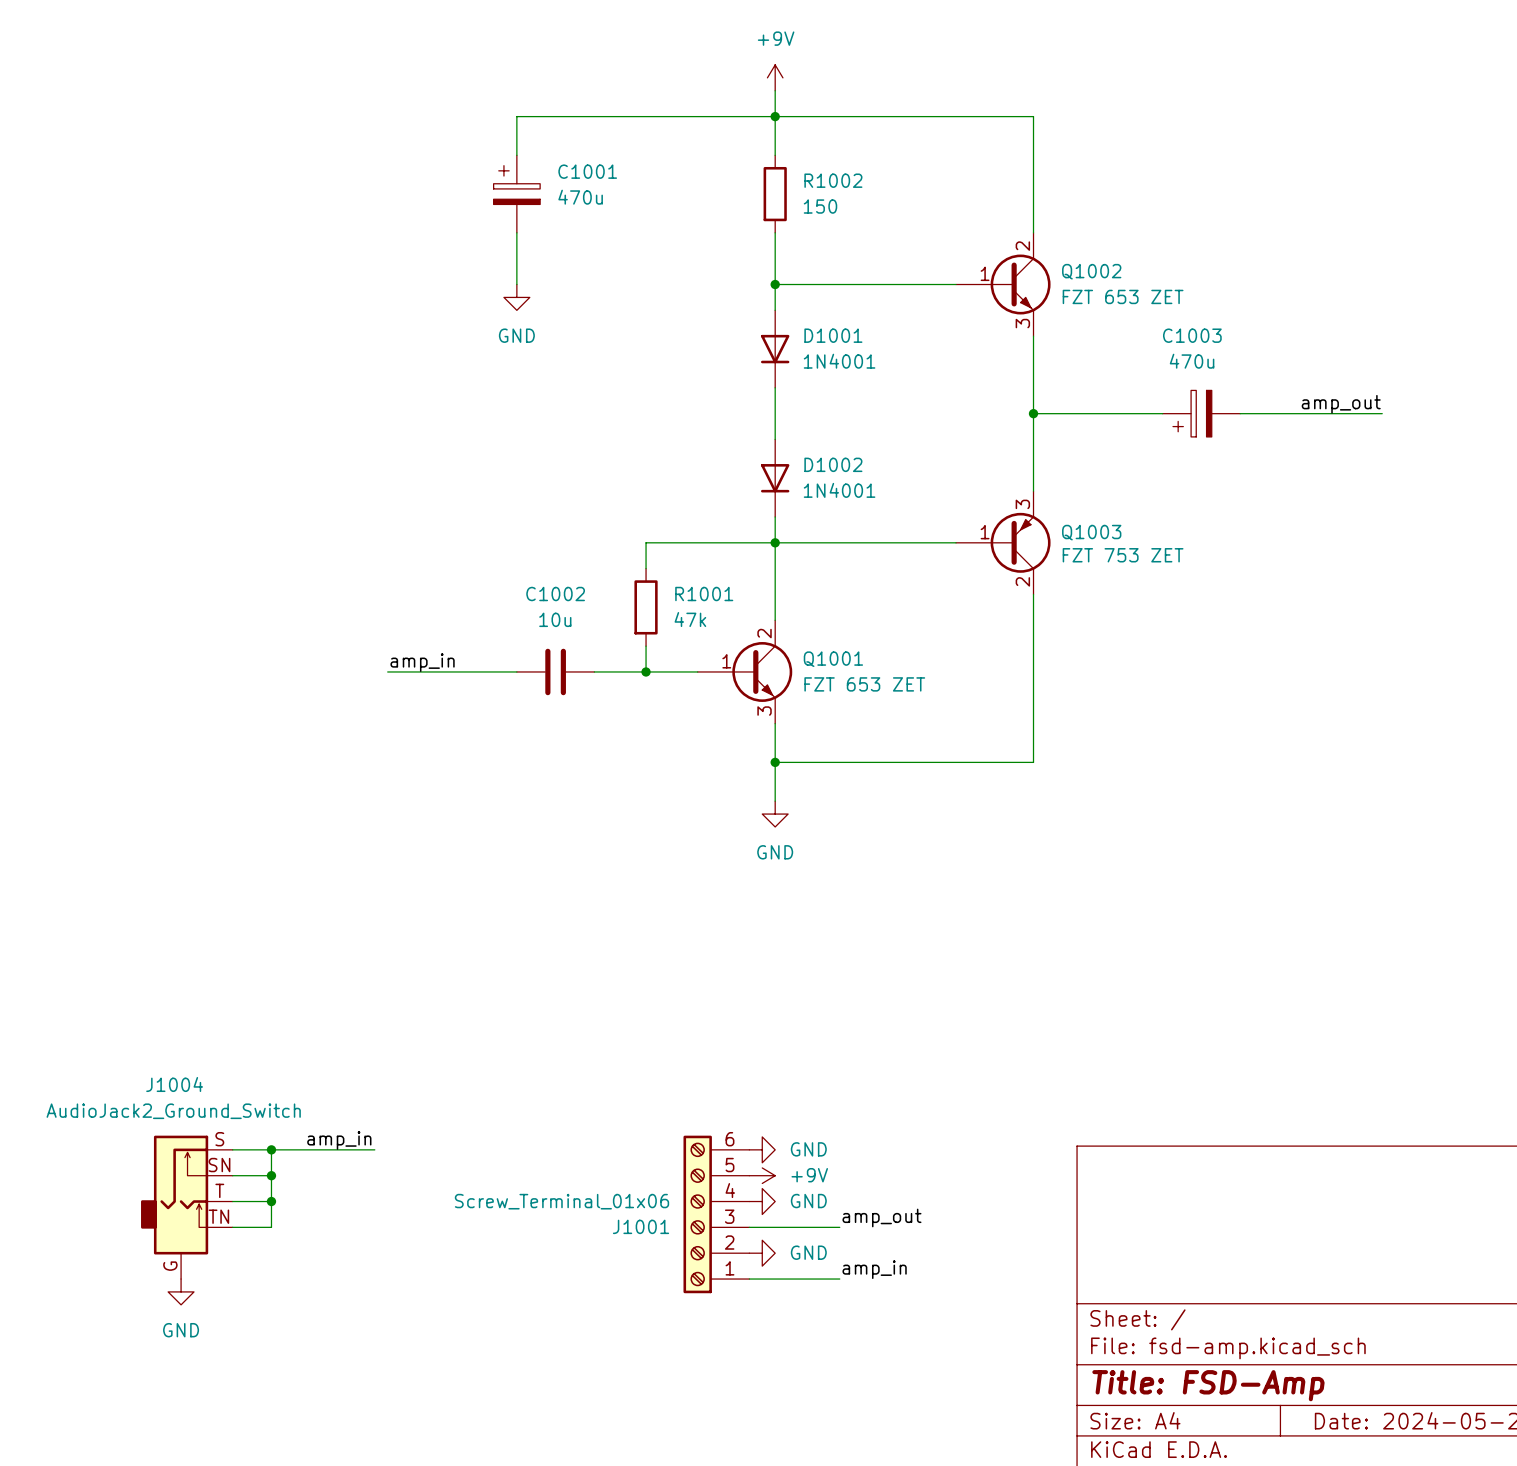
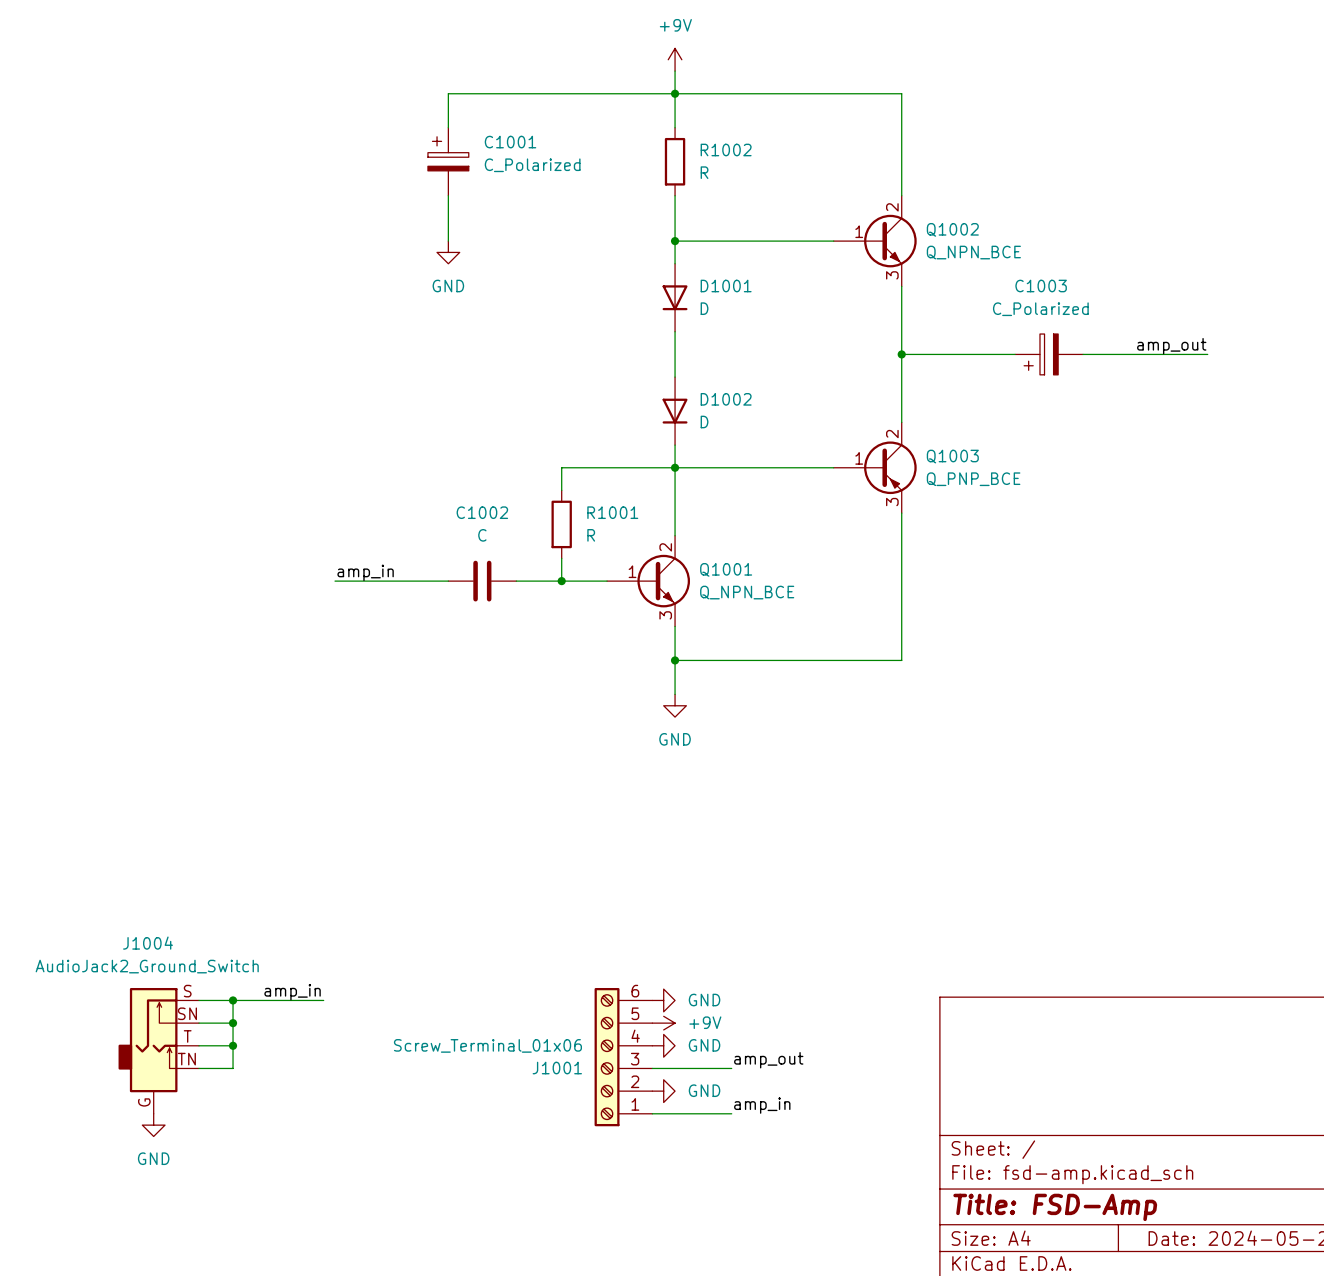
C1001 value: 470u (580, 197) -> C_Polarized (532, 165)
R1002 value: 150 (820, 206) -> R (704, 172)
Q1002 value: FZT 653 ZET (1123, 296) -> Q_NPN_BCE (973, 252)
D1001 value: 1N4001 (839, 361) -> D (704, 308)
C1003 value: 470u (1192, 361) -> C_Polarized (1040, 309)
D1002 value: 1N4001 (839, 490) -> D (704, 422)
Q1003 flip: as is (1020, 542) -> up-down (890, 467)
Q1003 value: FZT 753 ZET (1123, 555) -> Q_PNP_BCE (973, 479)
C1002 value: 10u (555, 619) -> C (482, 535)
R1001 value: 47k (690, 619) -> R (591, 535)
Q1001 value: FZT 653 ZET (864, 684) -> Q_NPN_BCE (747, 592)

